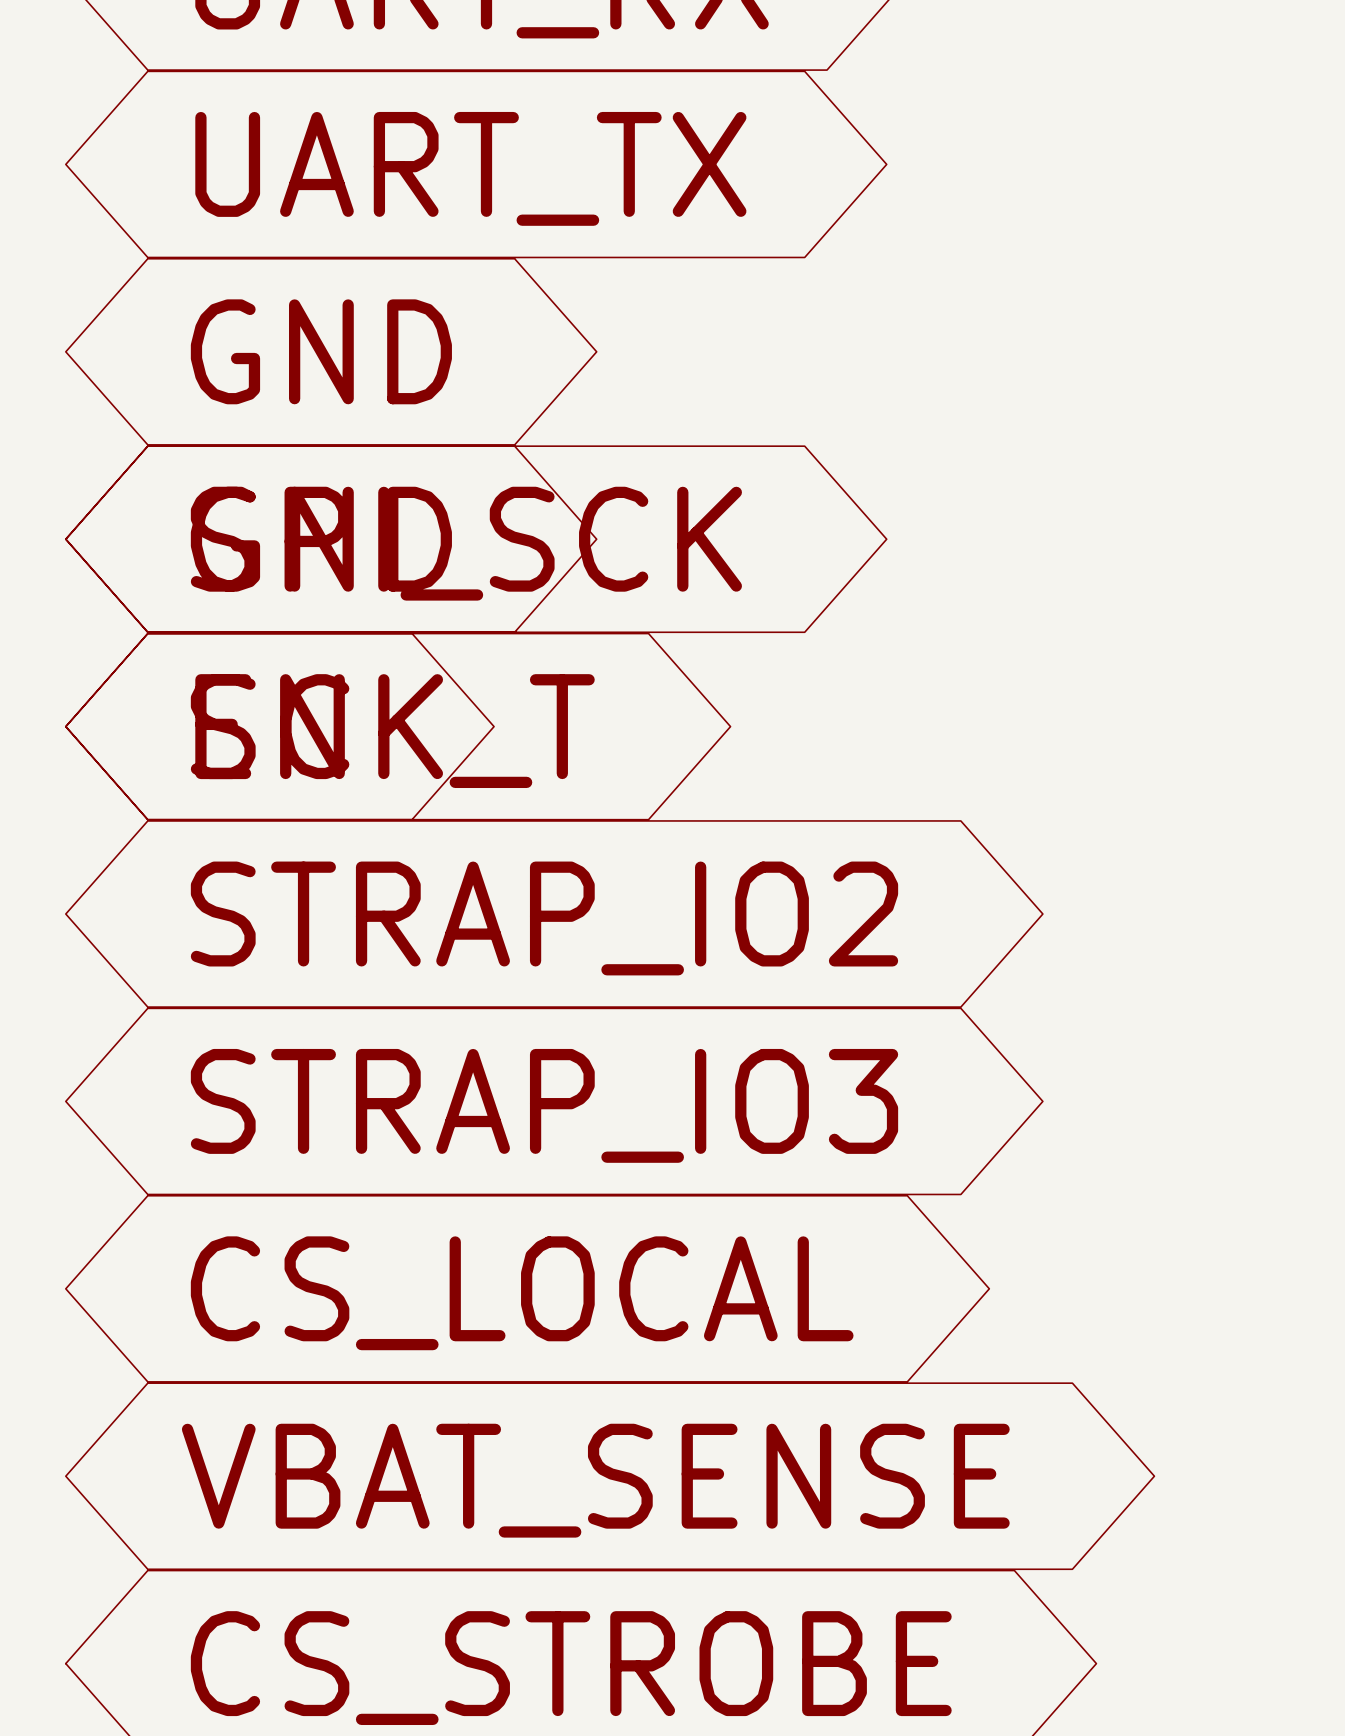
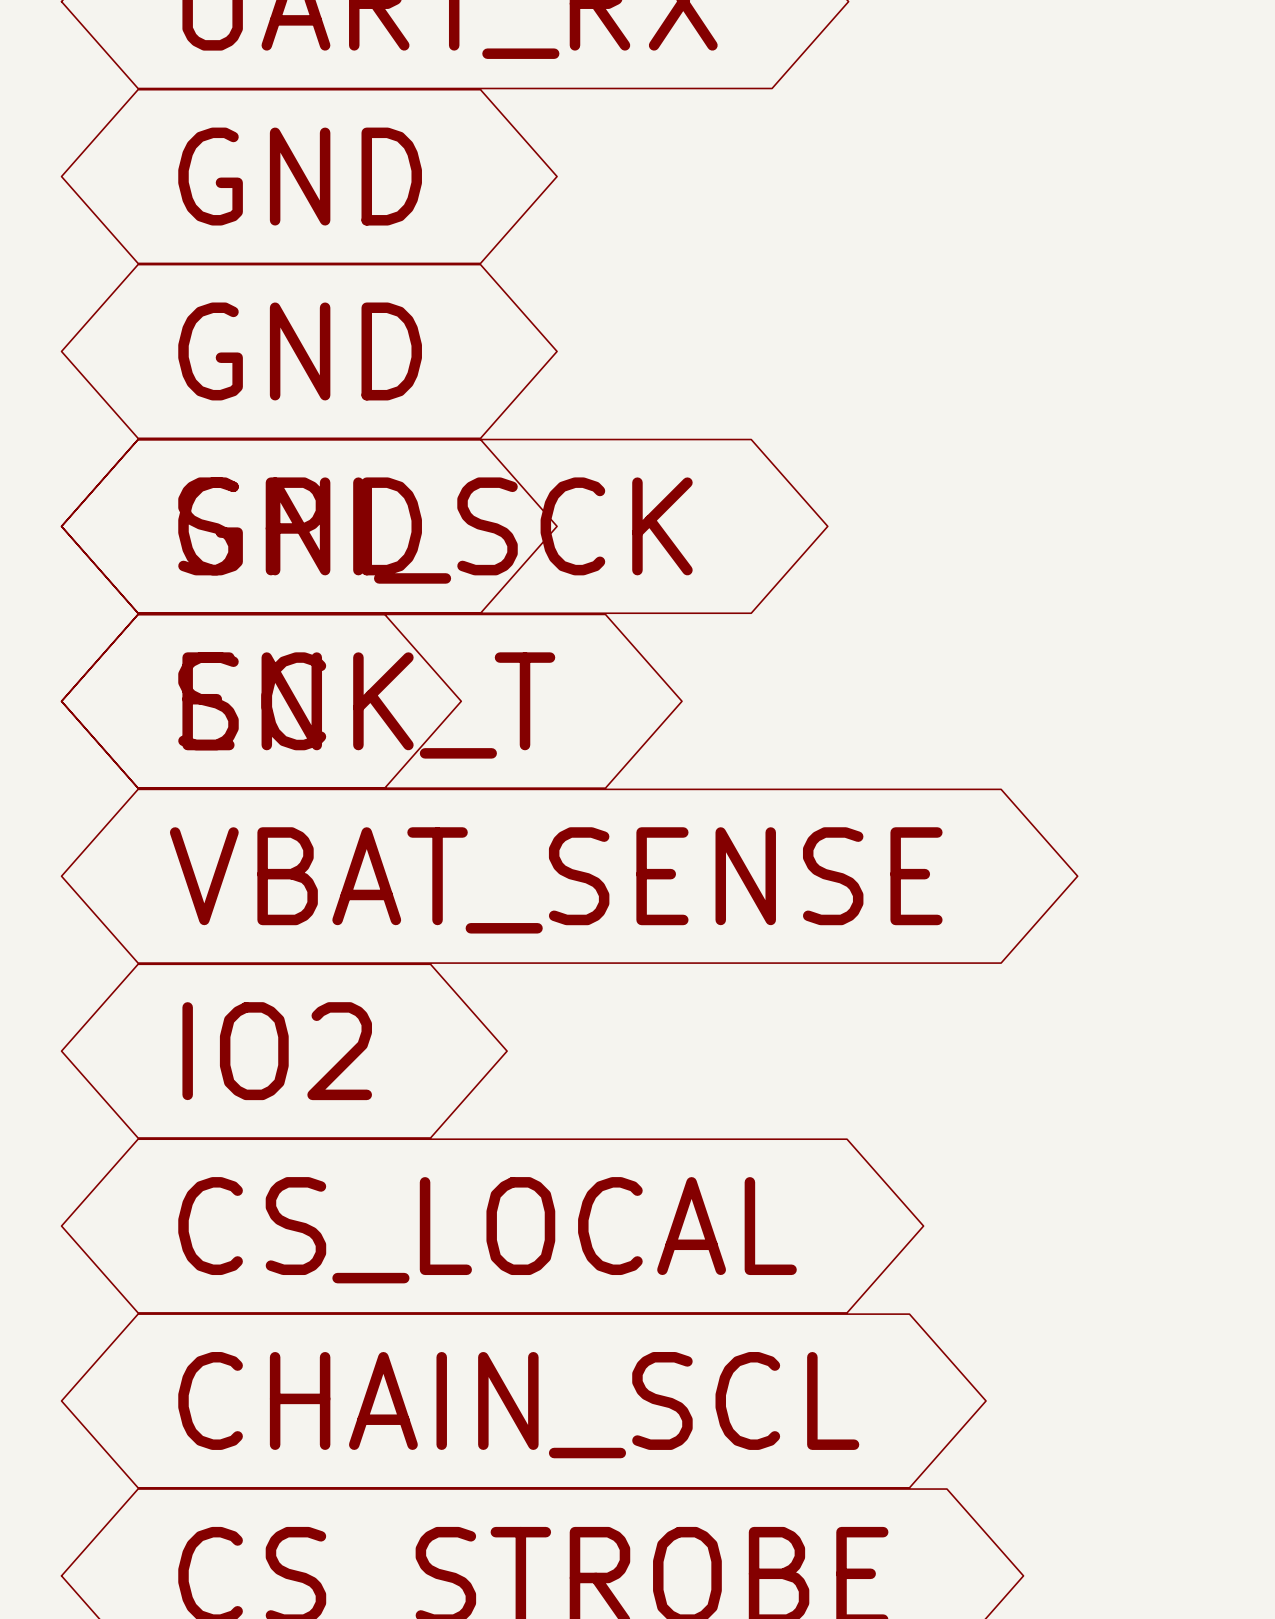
global label: UART_TX (470, 168) -> GND (300, 176)
global label: STRAP_IO2 (544, 918) -> VBAT_SENSE (556, 880)
global label: STRAP_IO3 (544, 1105) -> IO2 (277, 1051)
global label: VBAT_SENSE (595, 1480) -> CHAIN_SCL (518, 1405)

